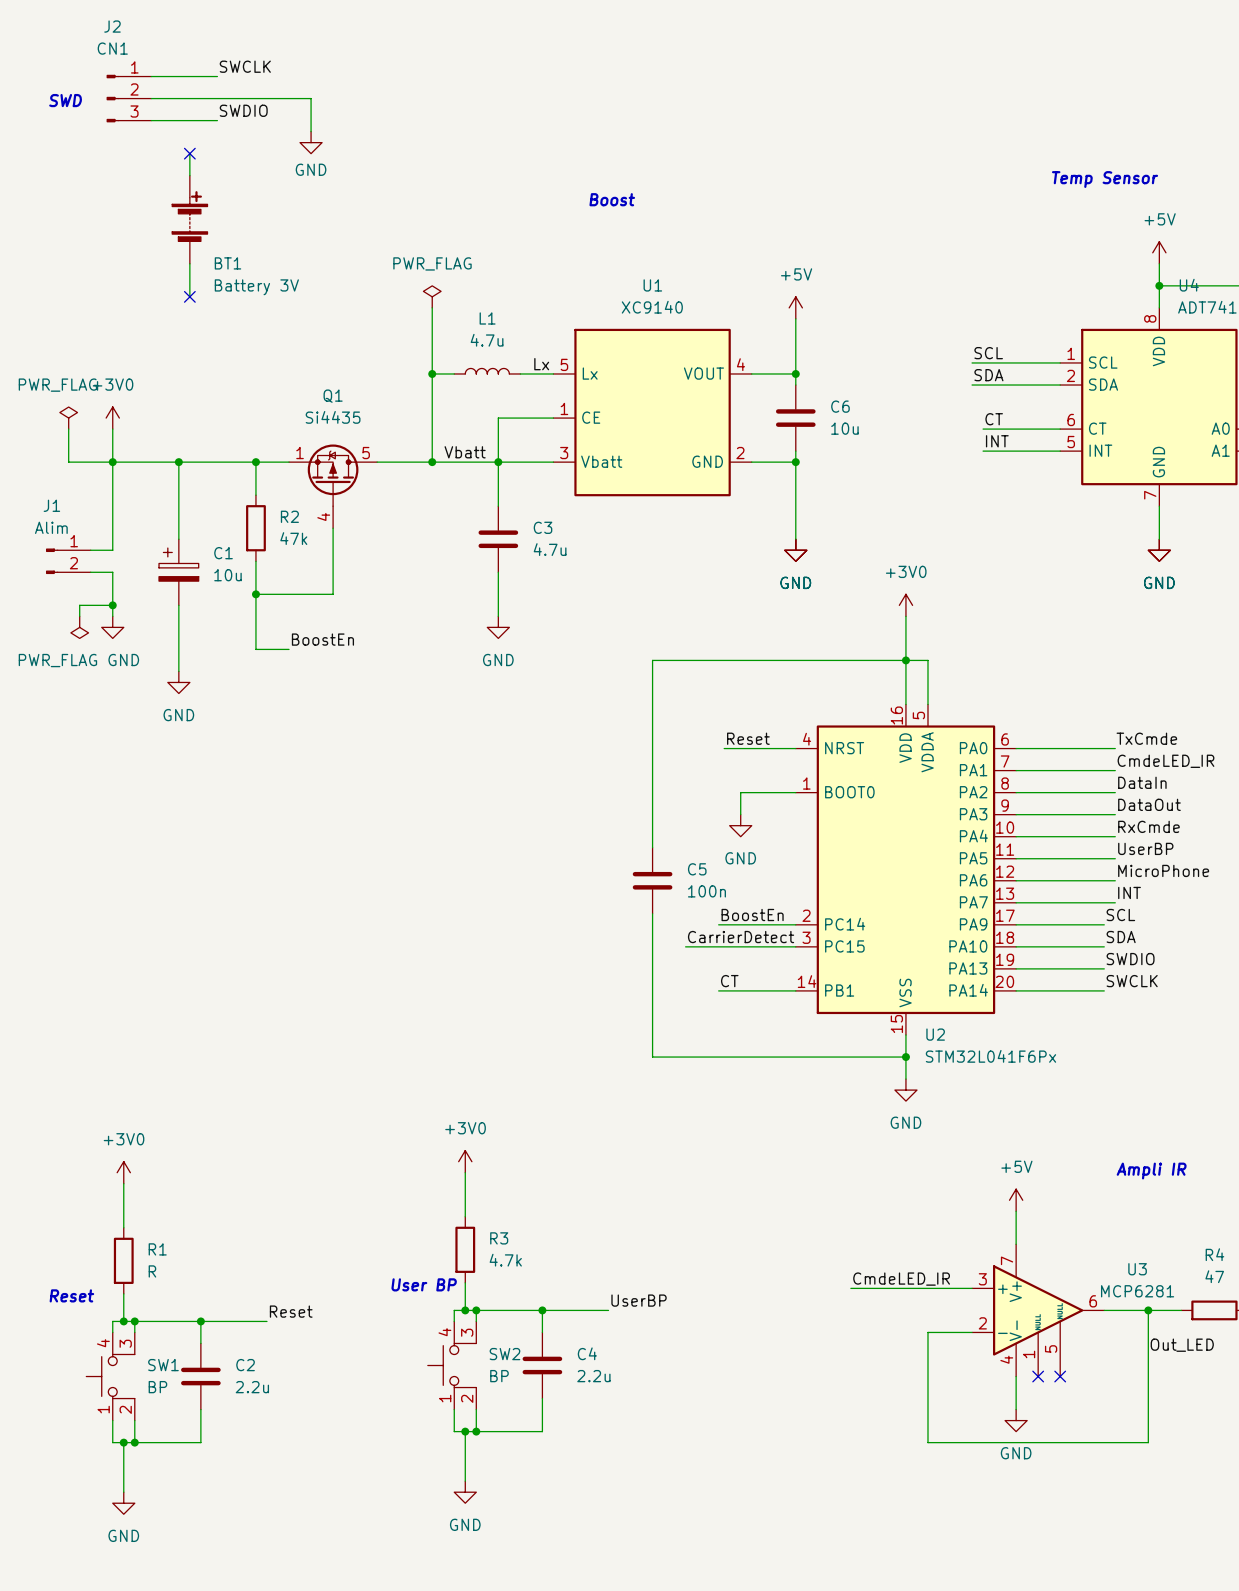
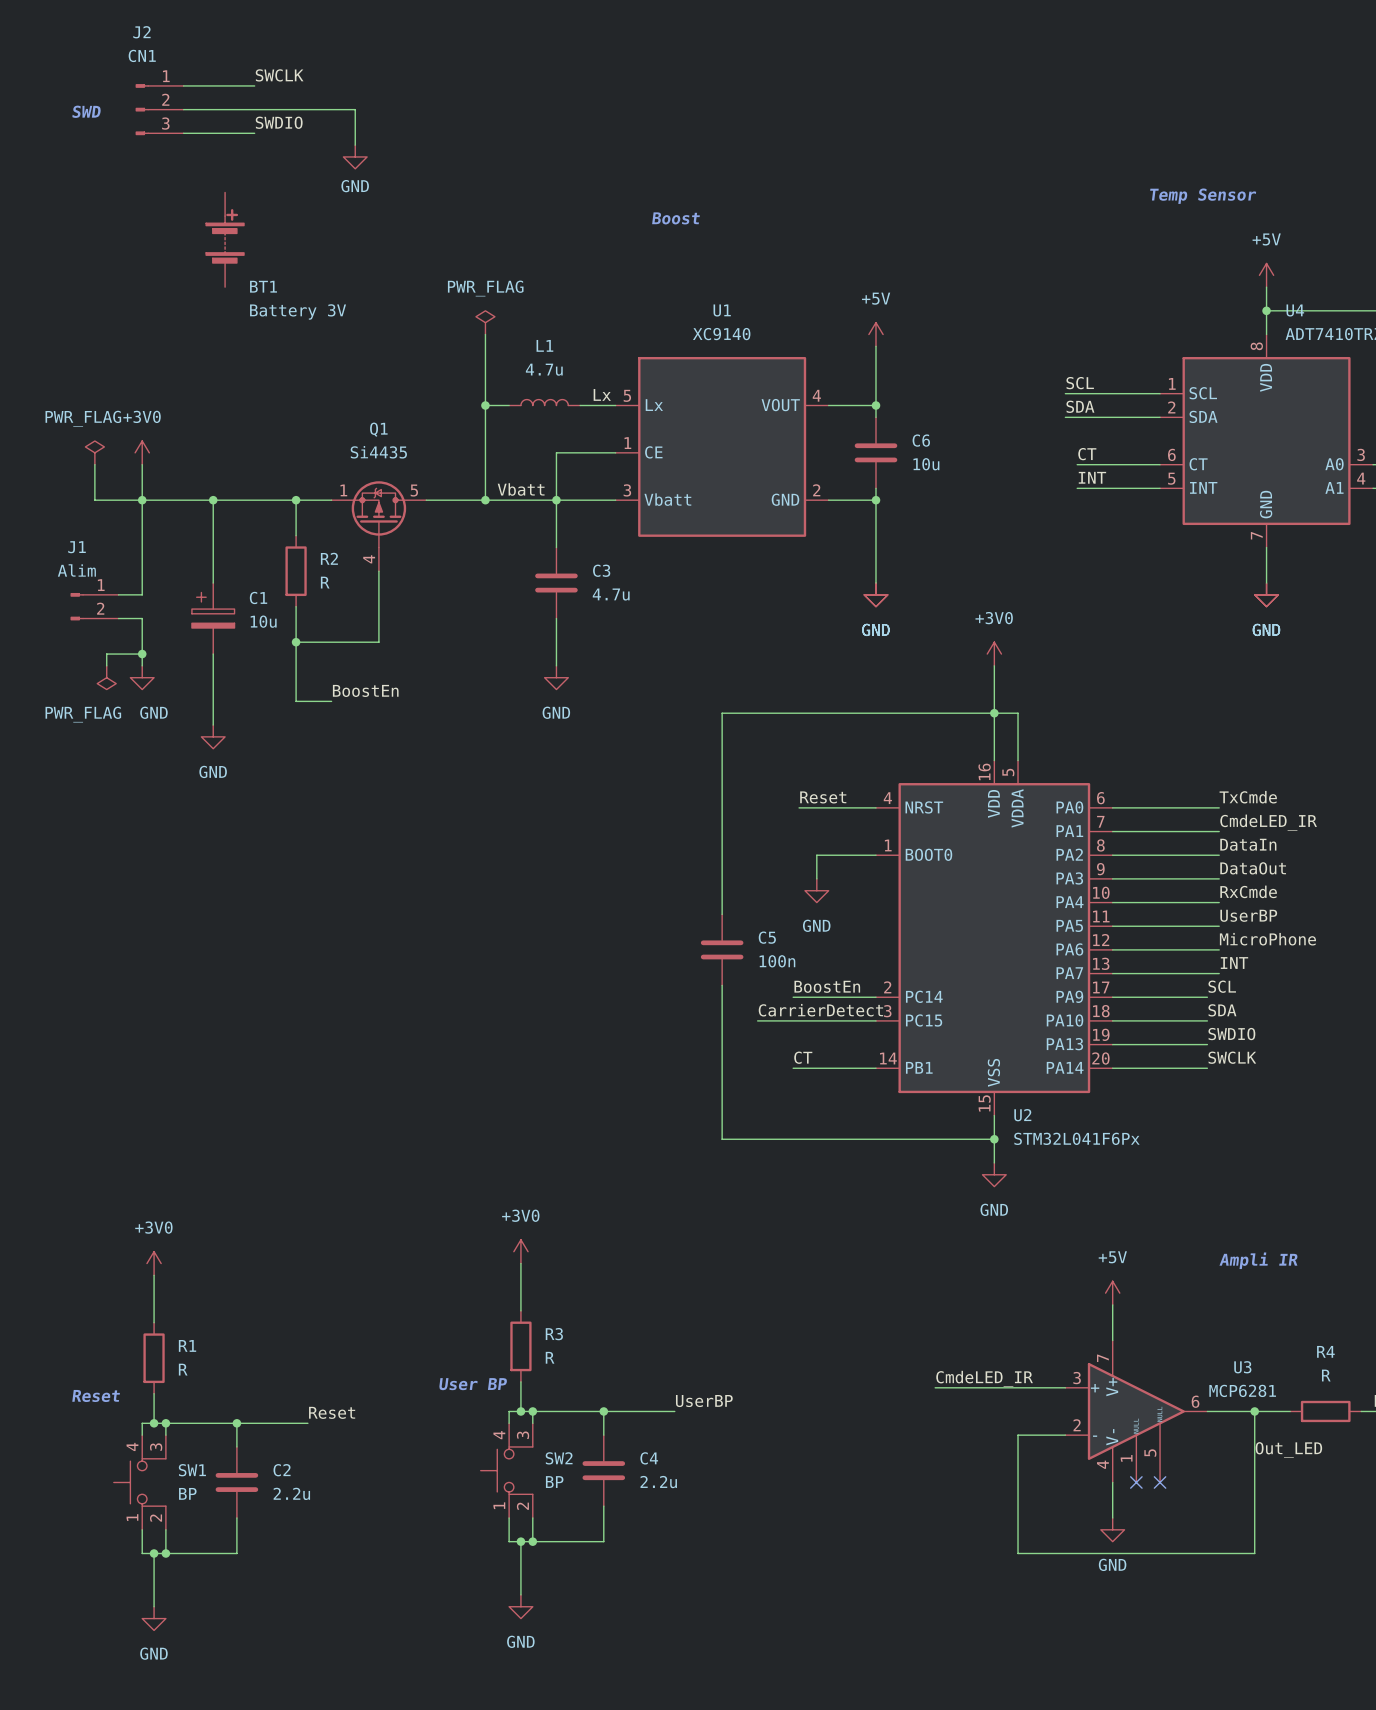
wire: (189, 153) (189, 175) -> none
no-connect mark: (189, 153) -> none
wire: (189, 263) (189, 296) -> none
no-connect mark: (189, 296) -> none
R2 value: 47k (293, 538) -> R (325, 582)
R3 value: 4.7k (505, 1260) -> R (550, 1357)
R4 value: 47 (1214, 1276) -> R (1326, 1375)

